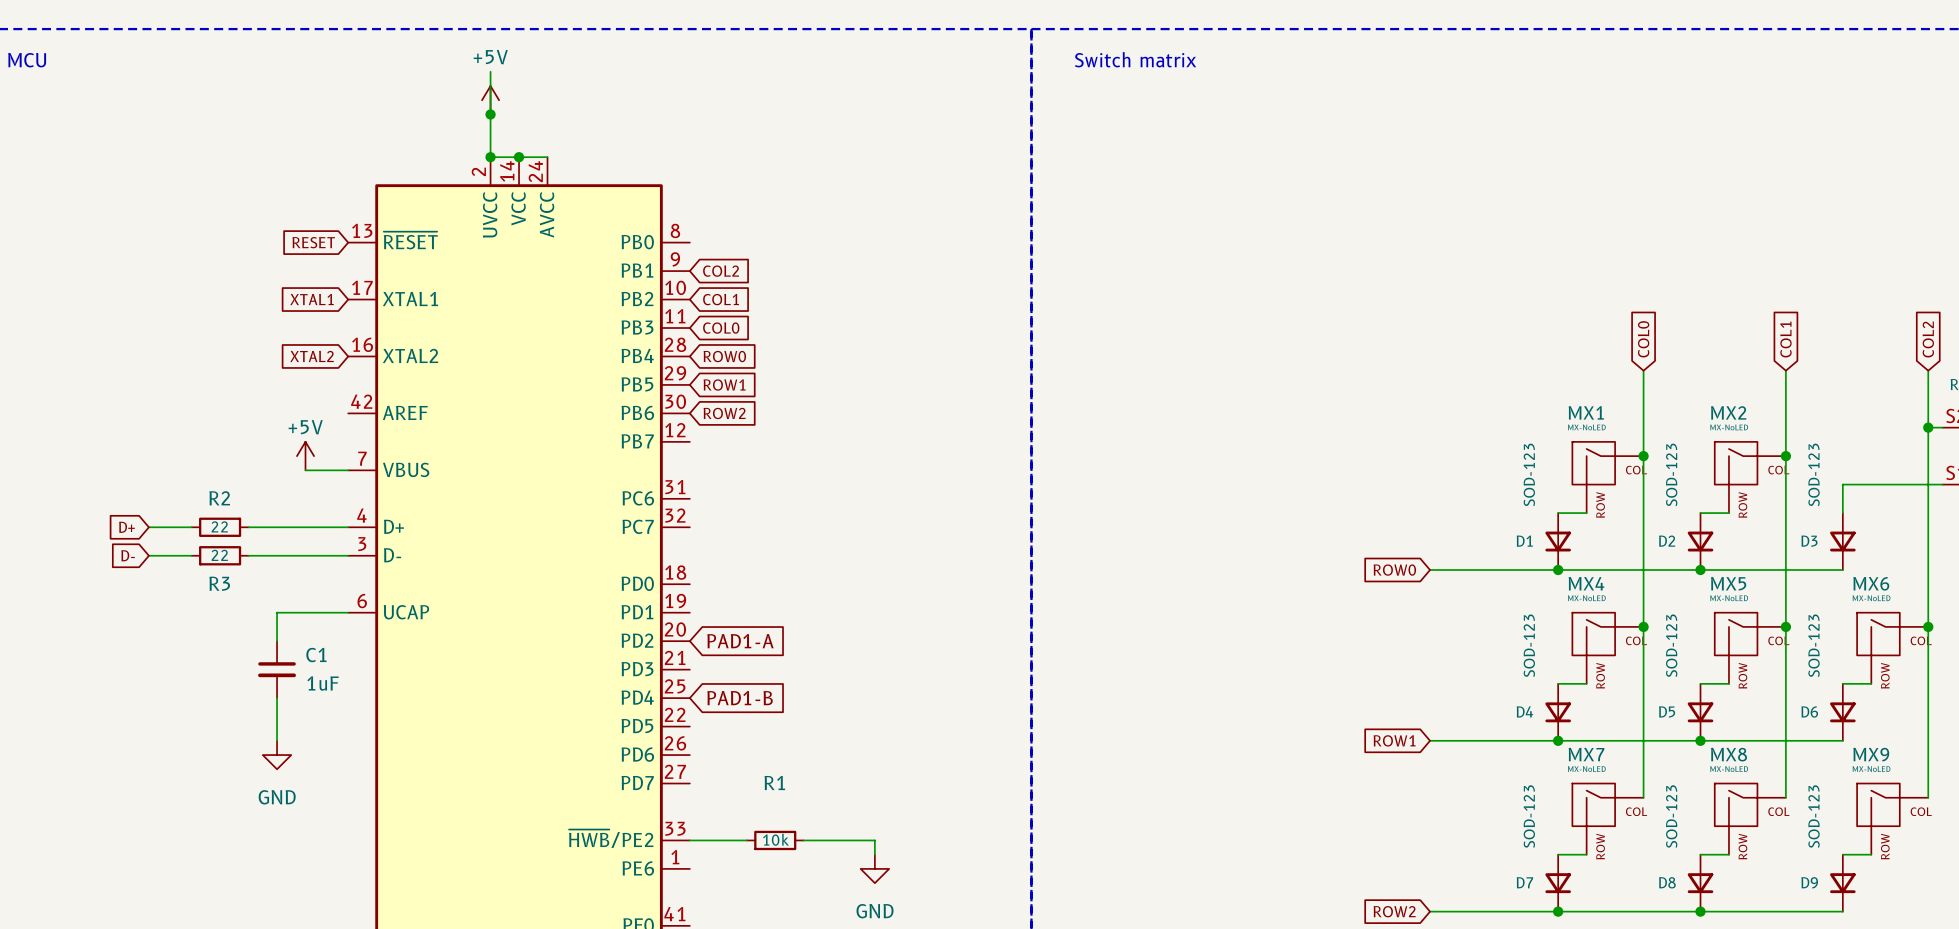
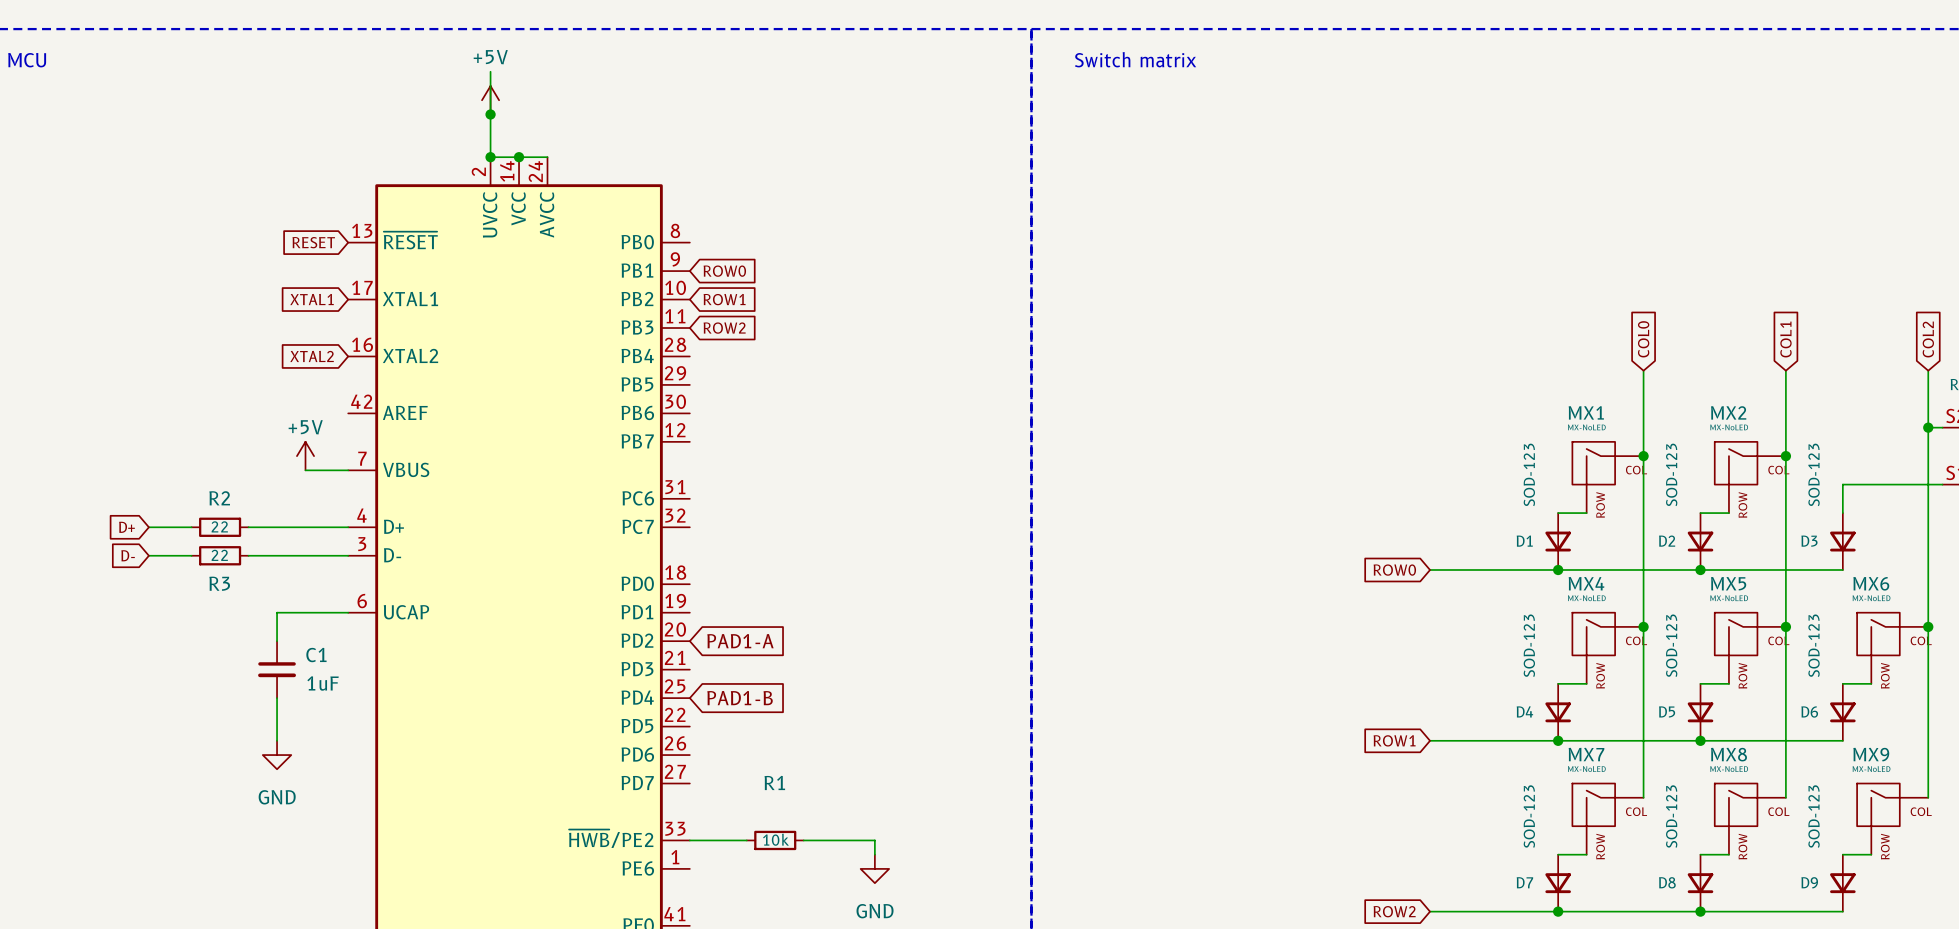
global label: COL2 (721, 271) -> ROW0 (724, 271)
global label: COL1 (721, 299) -> ROW1 (724, 299)
global label: COL0 (721, 328) -> ROW2 (724, 328)
global label: ROW0 (724, 356) -> none
global label: ROW1 (724, 385) -> none
global label: ROW2 (724, 413) -> none

